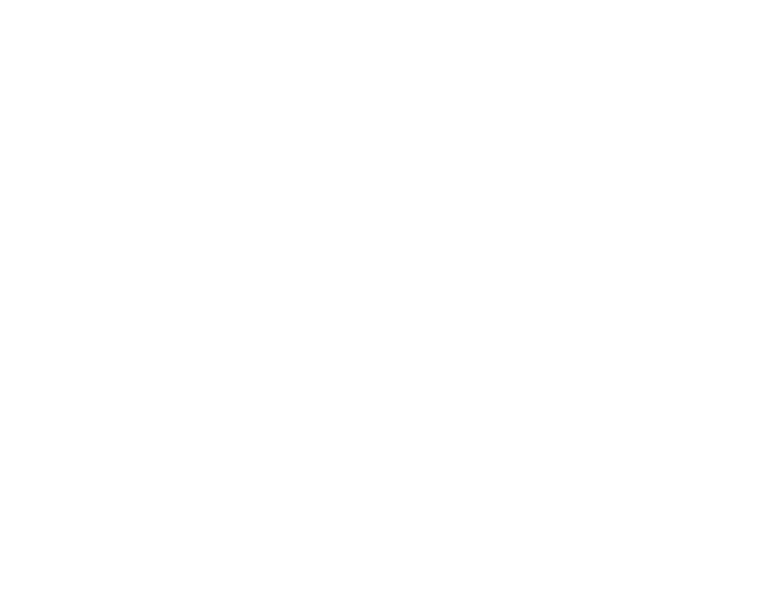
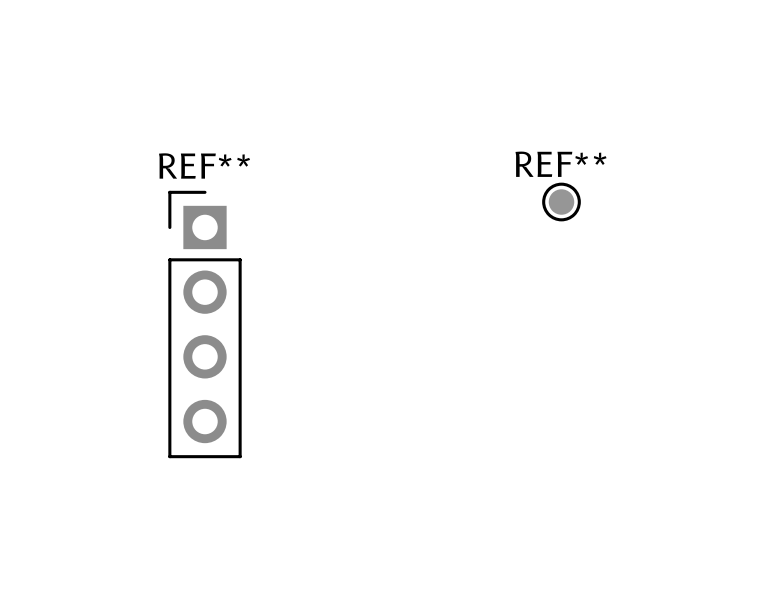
REF**: none -> (561, 202)
REF**: none -> (204, 324)

